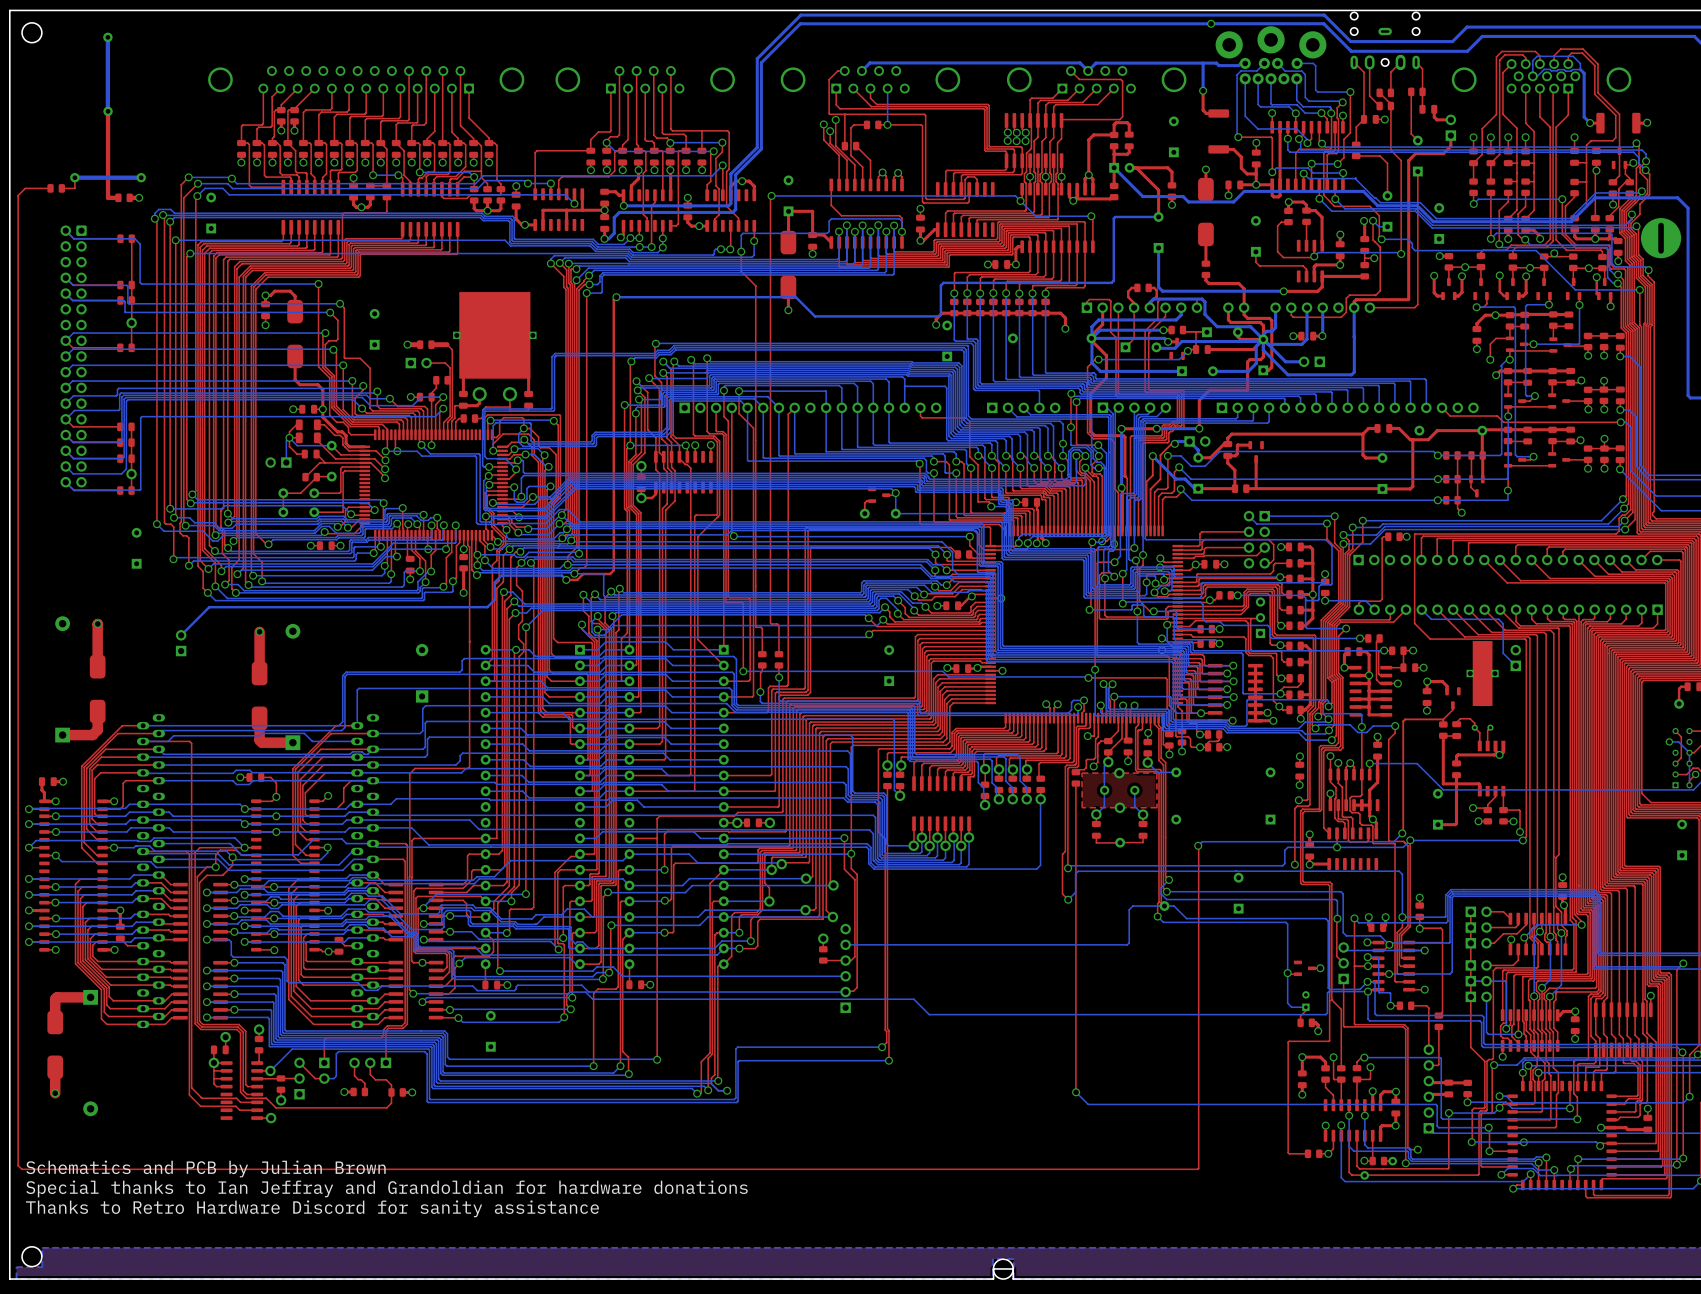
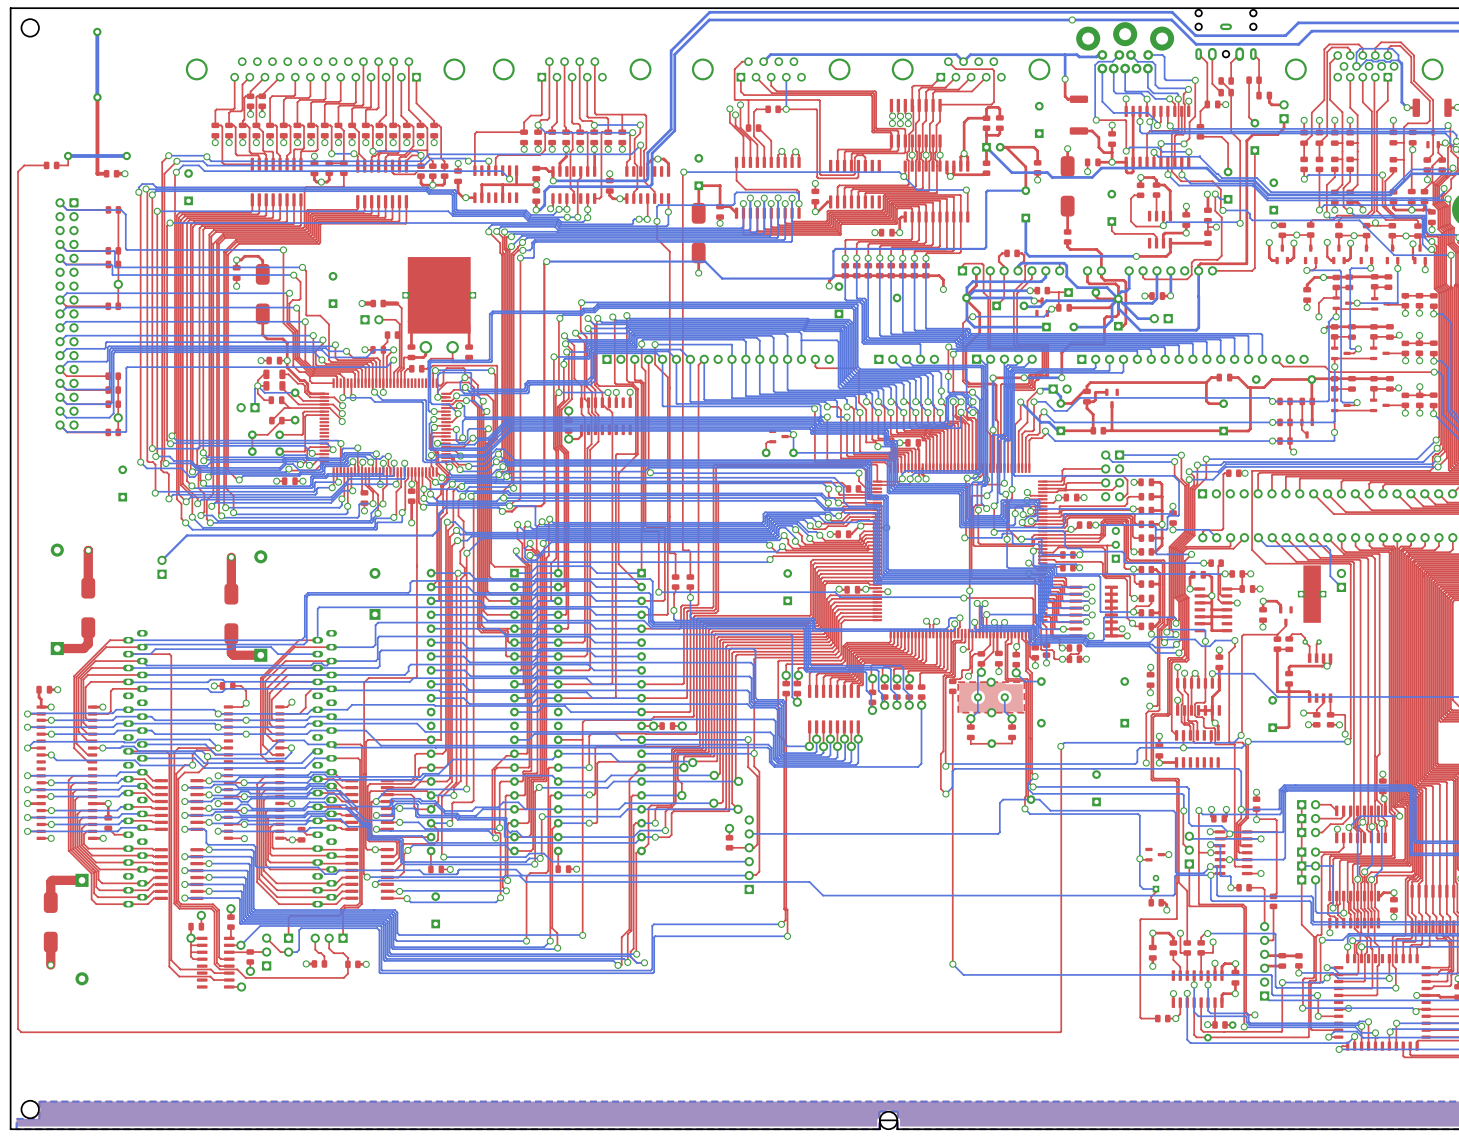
text: Schematics and PCB by Julian Brown (205, 1168) -> none
text: Special thanks to Ian Jeffray and Grandoldian for hardware donations (387, 1188) -> none
text: Thanks to Retro Hardware Discord for sanity assistance (312, 1208) -> none

